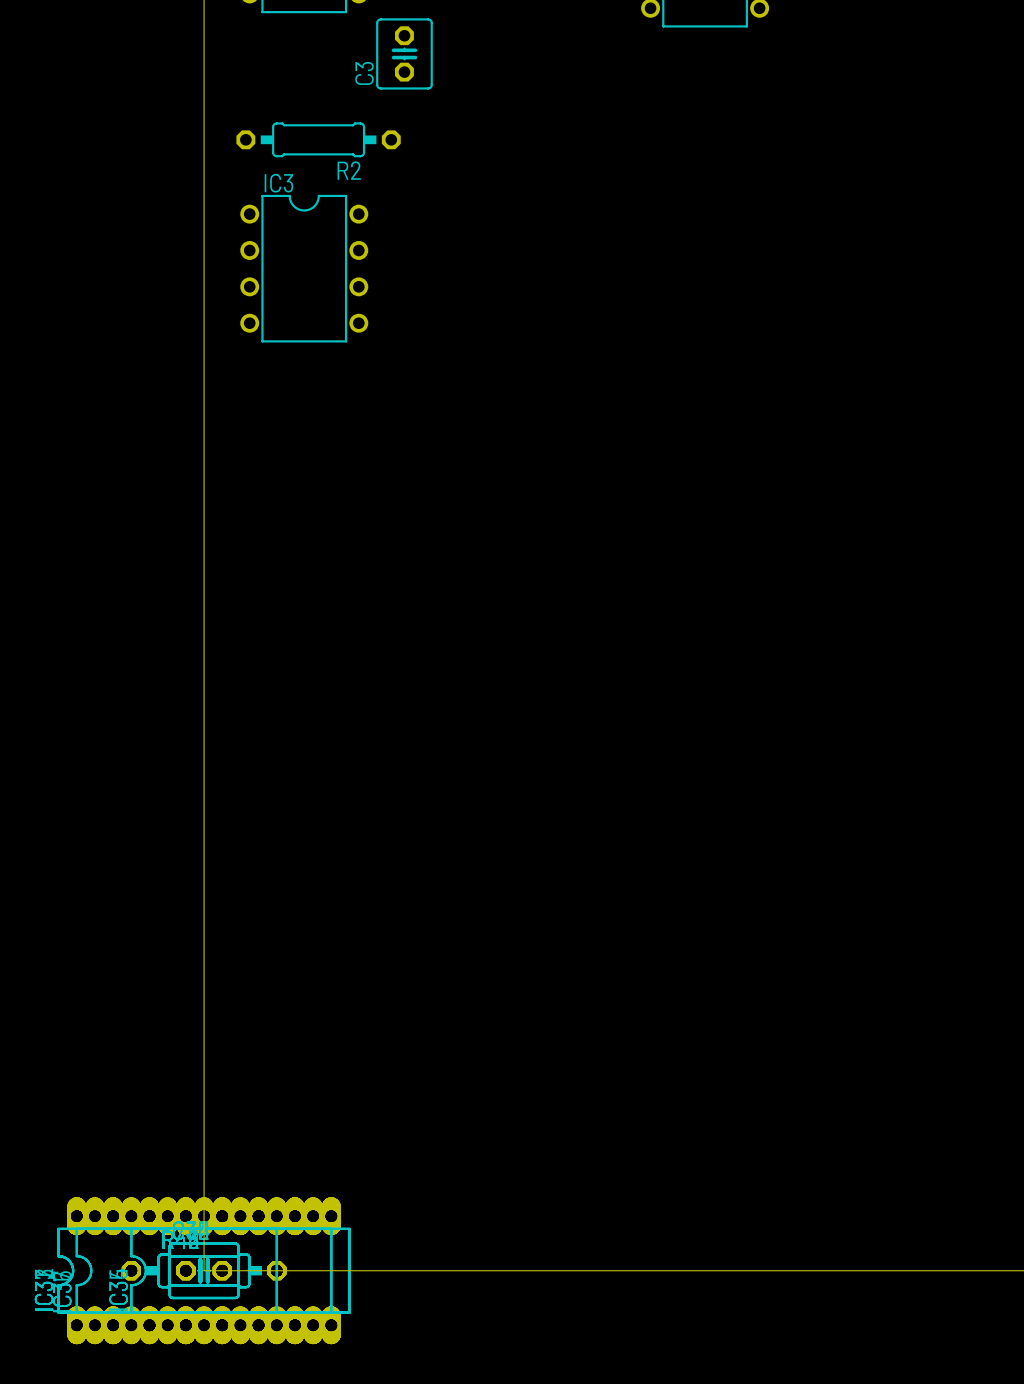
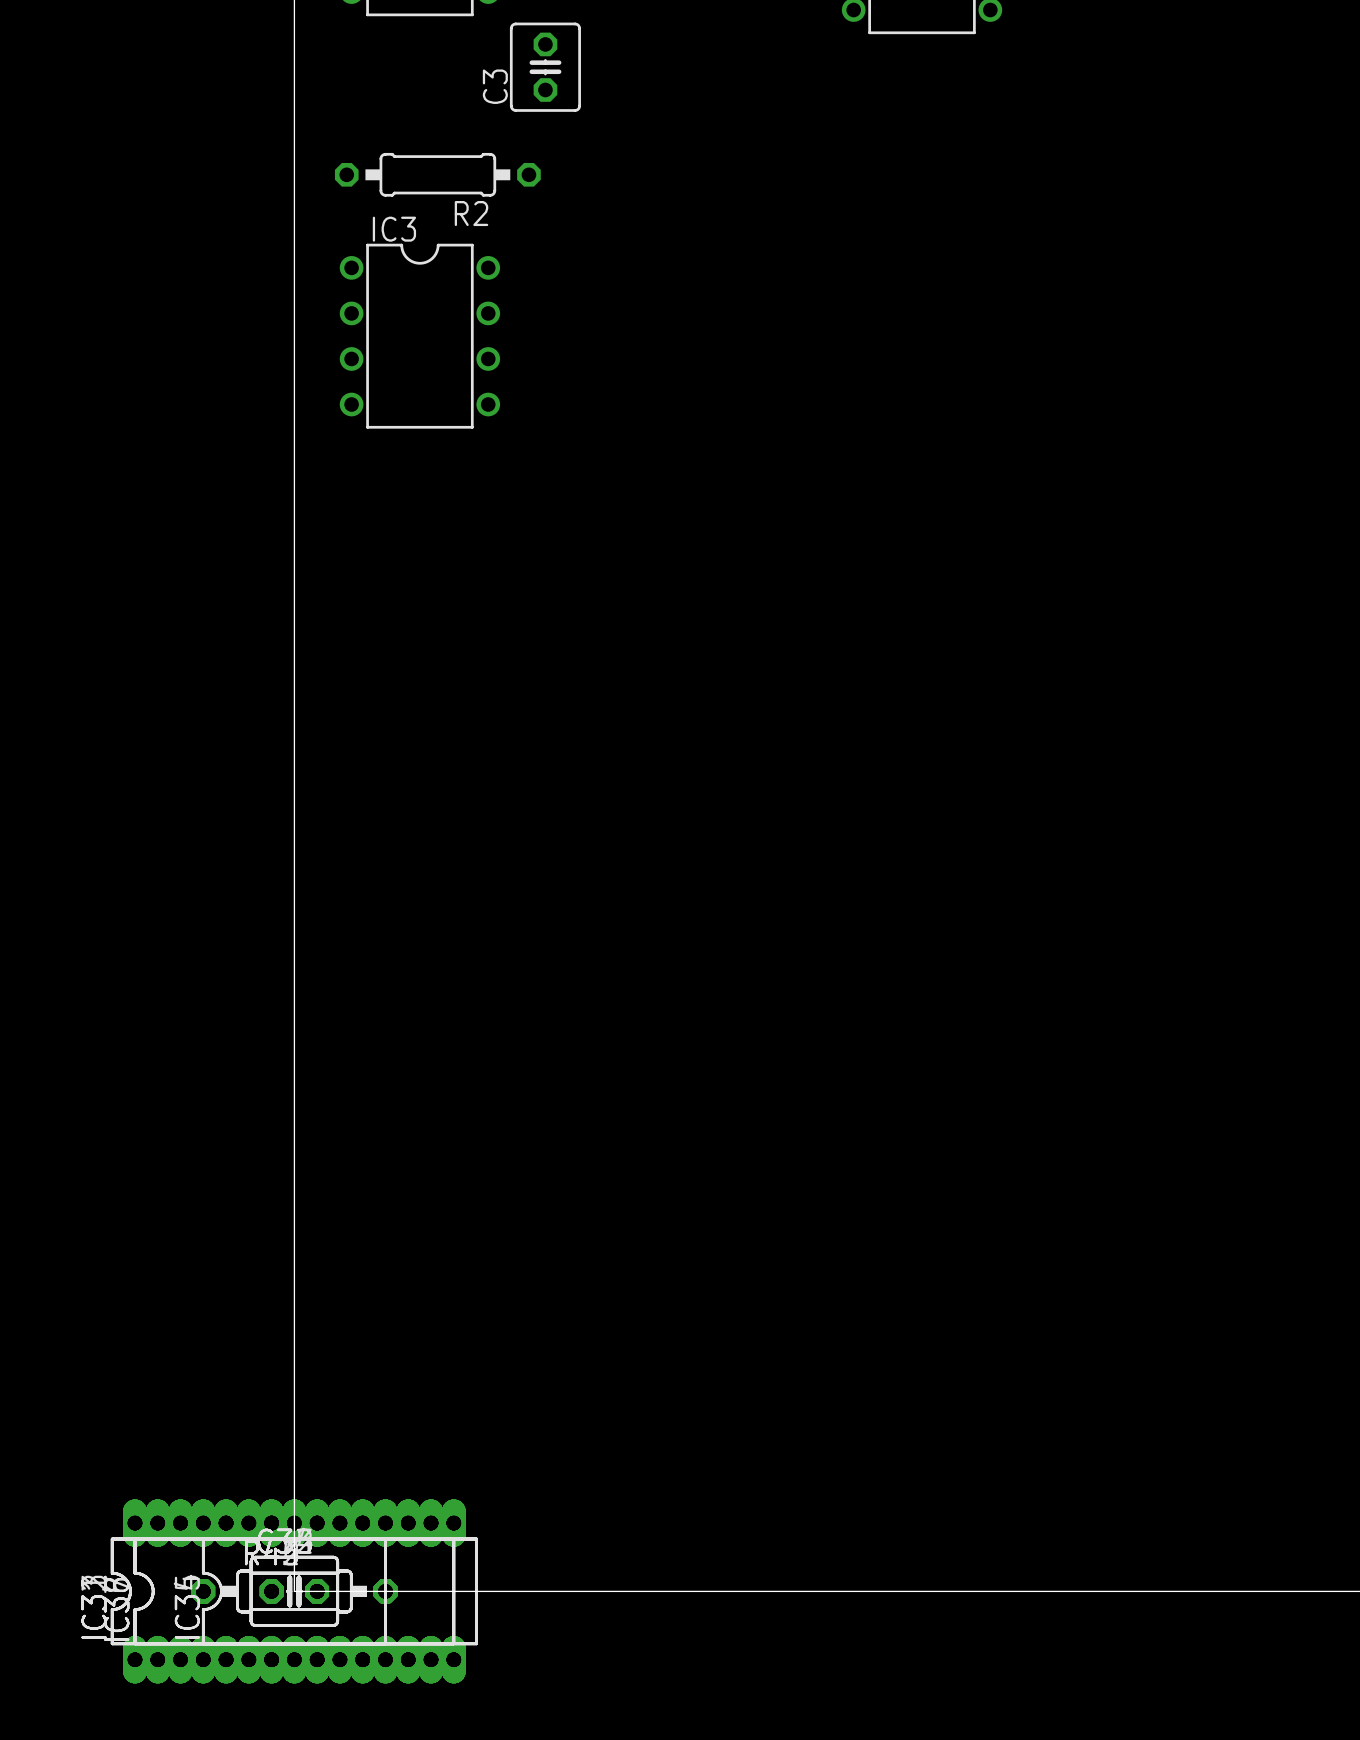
part: none -> (294, 1591)

